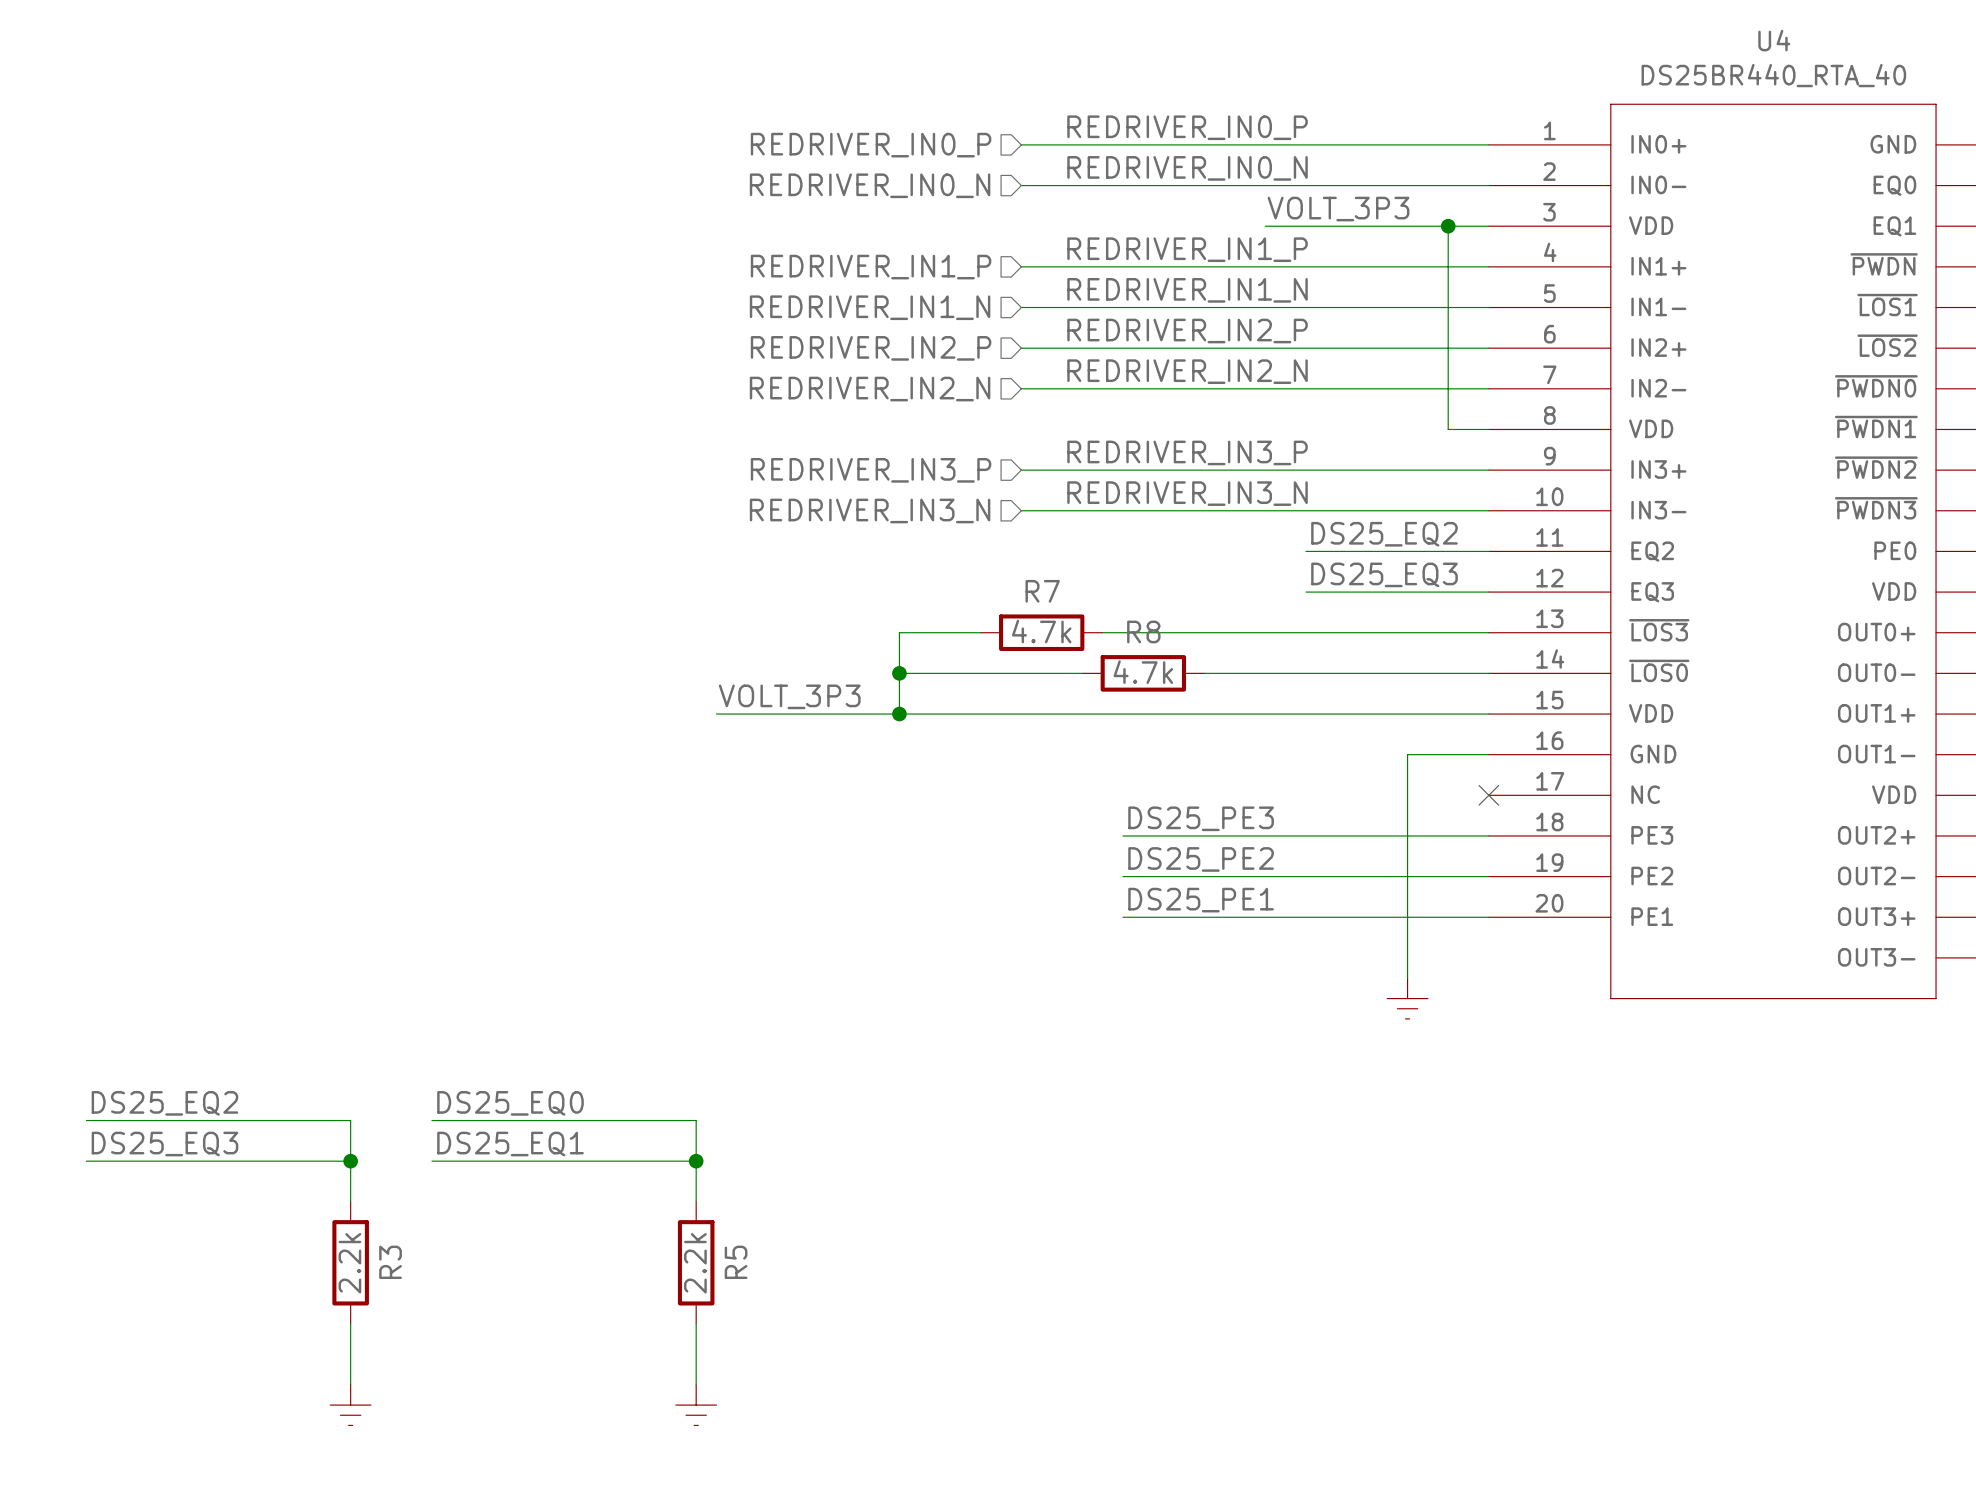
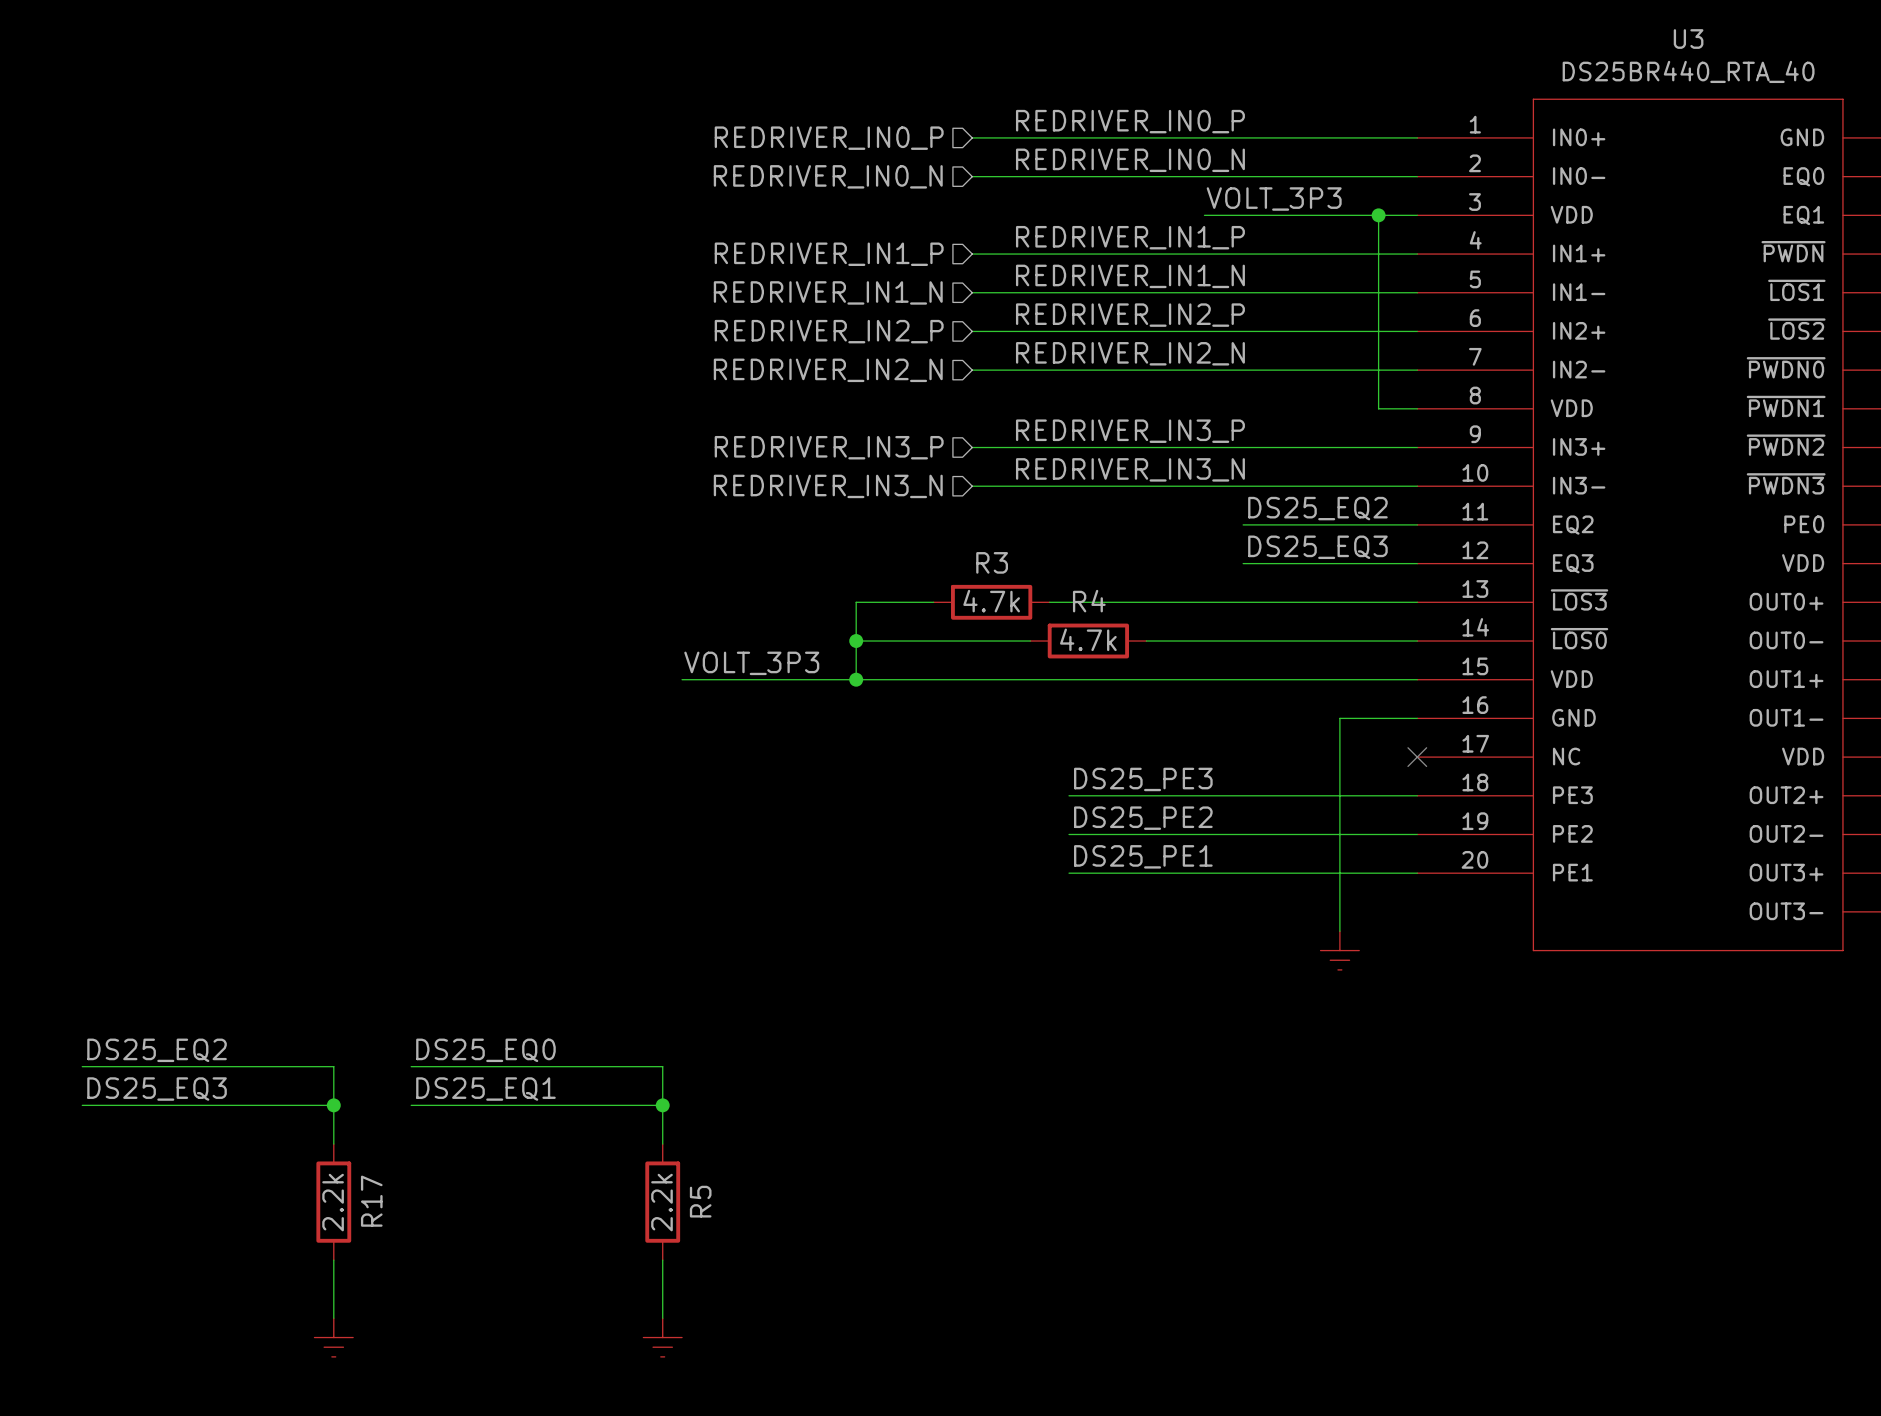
U4 name: U4 (1774, 40) -> U3 (1688, 39)
R7 name: R7 (1042, 591) -> R3 (992, 562)
R8 name: R8 (1143, 631) -> R4 (1089, 601)
R3 name: R3 (390, 1262) -> R17 (371, 1201)

